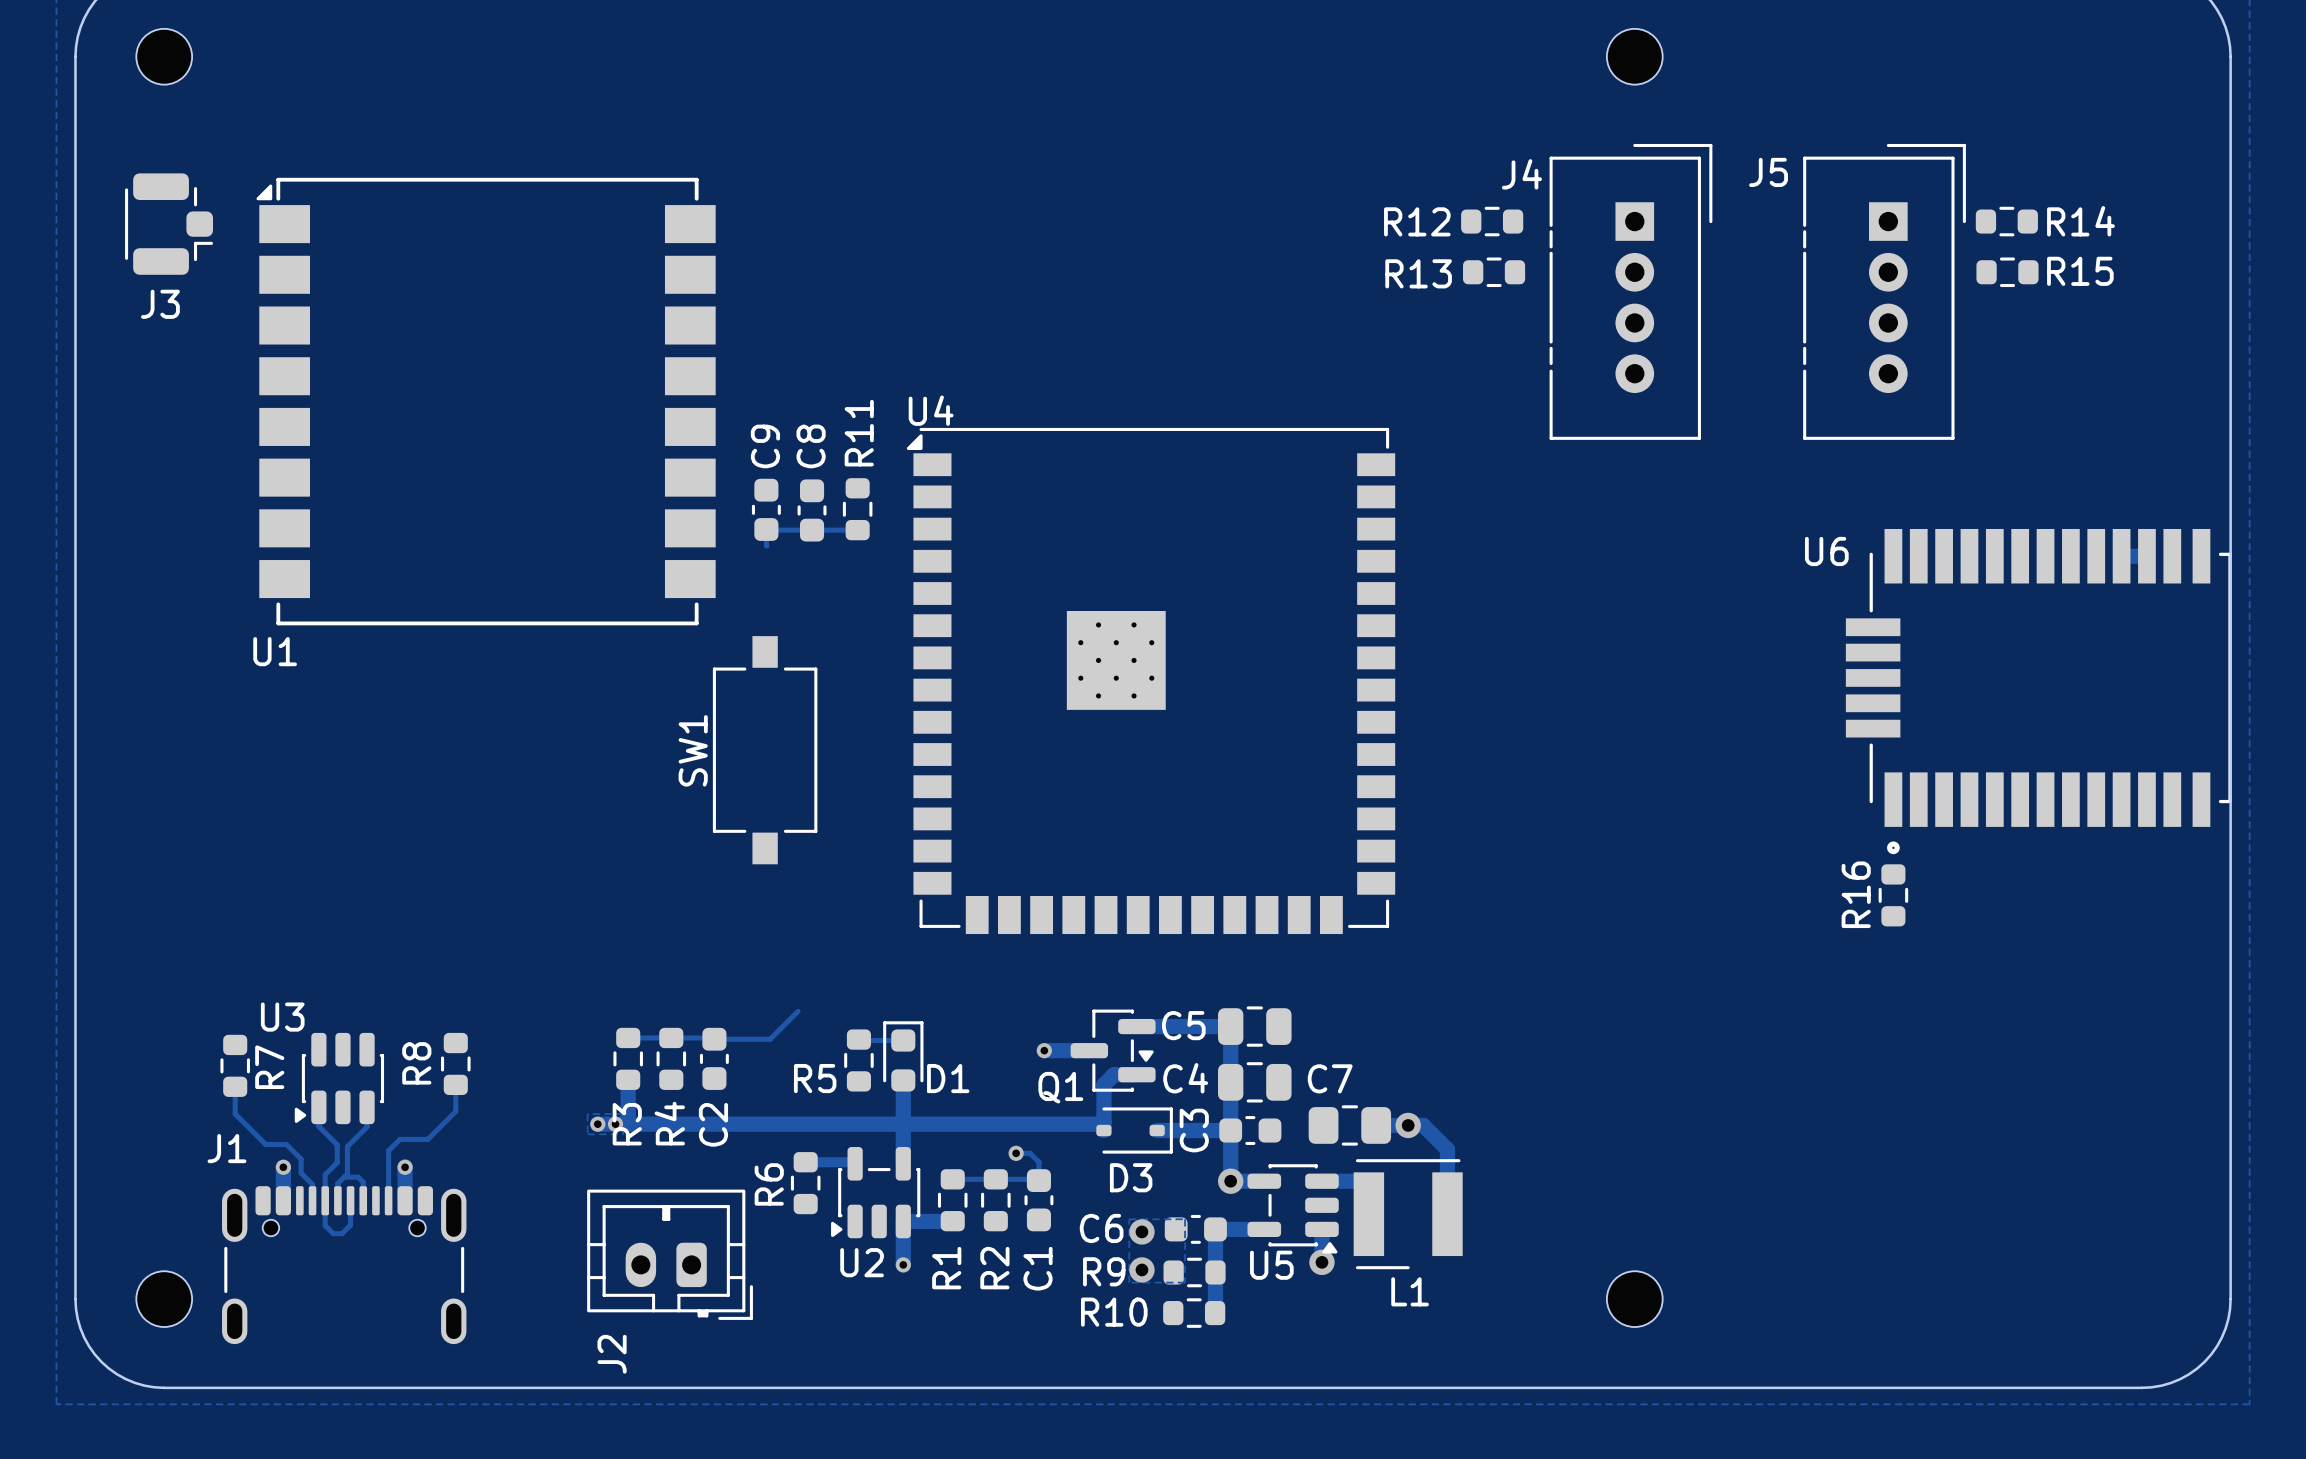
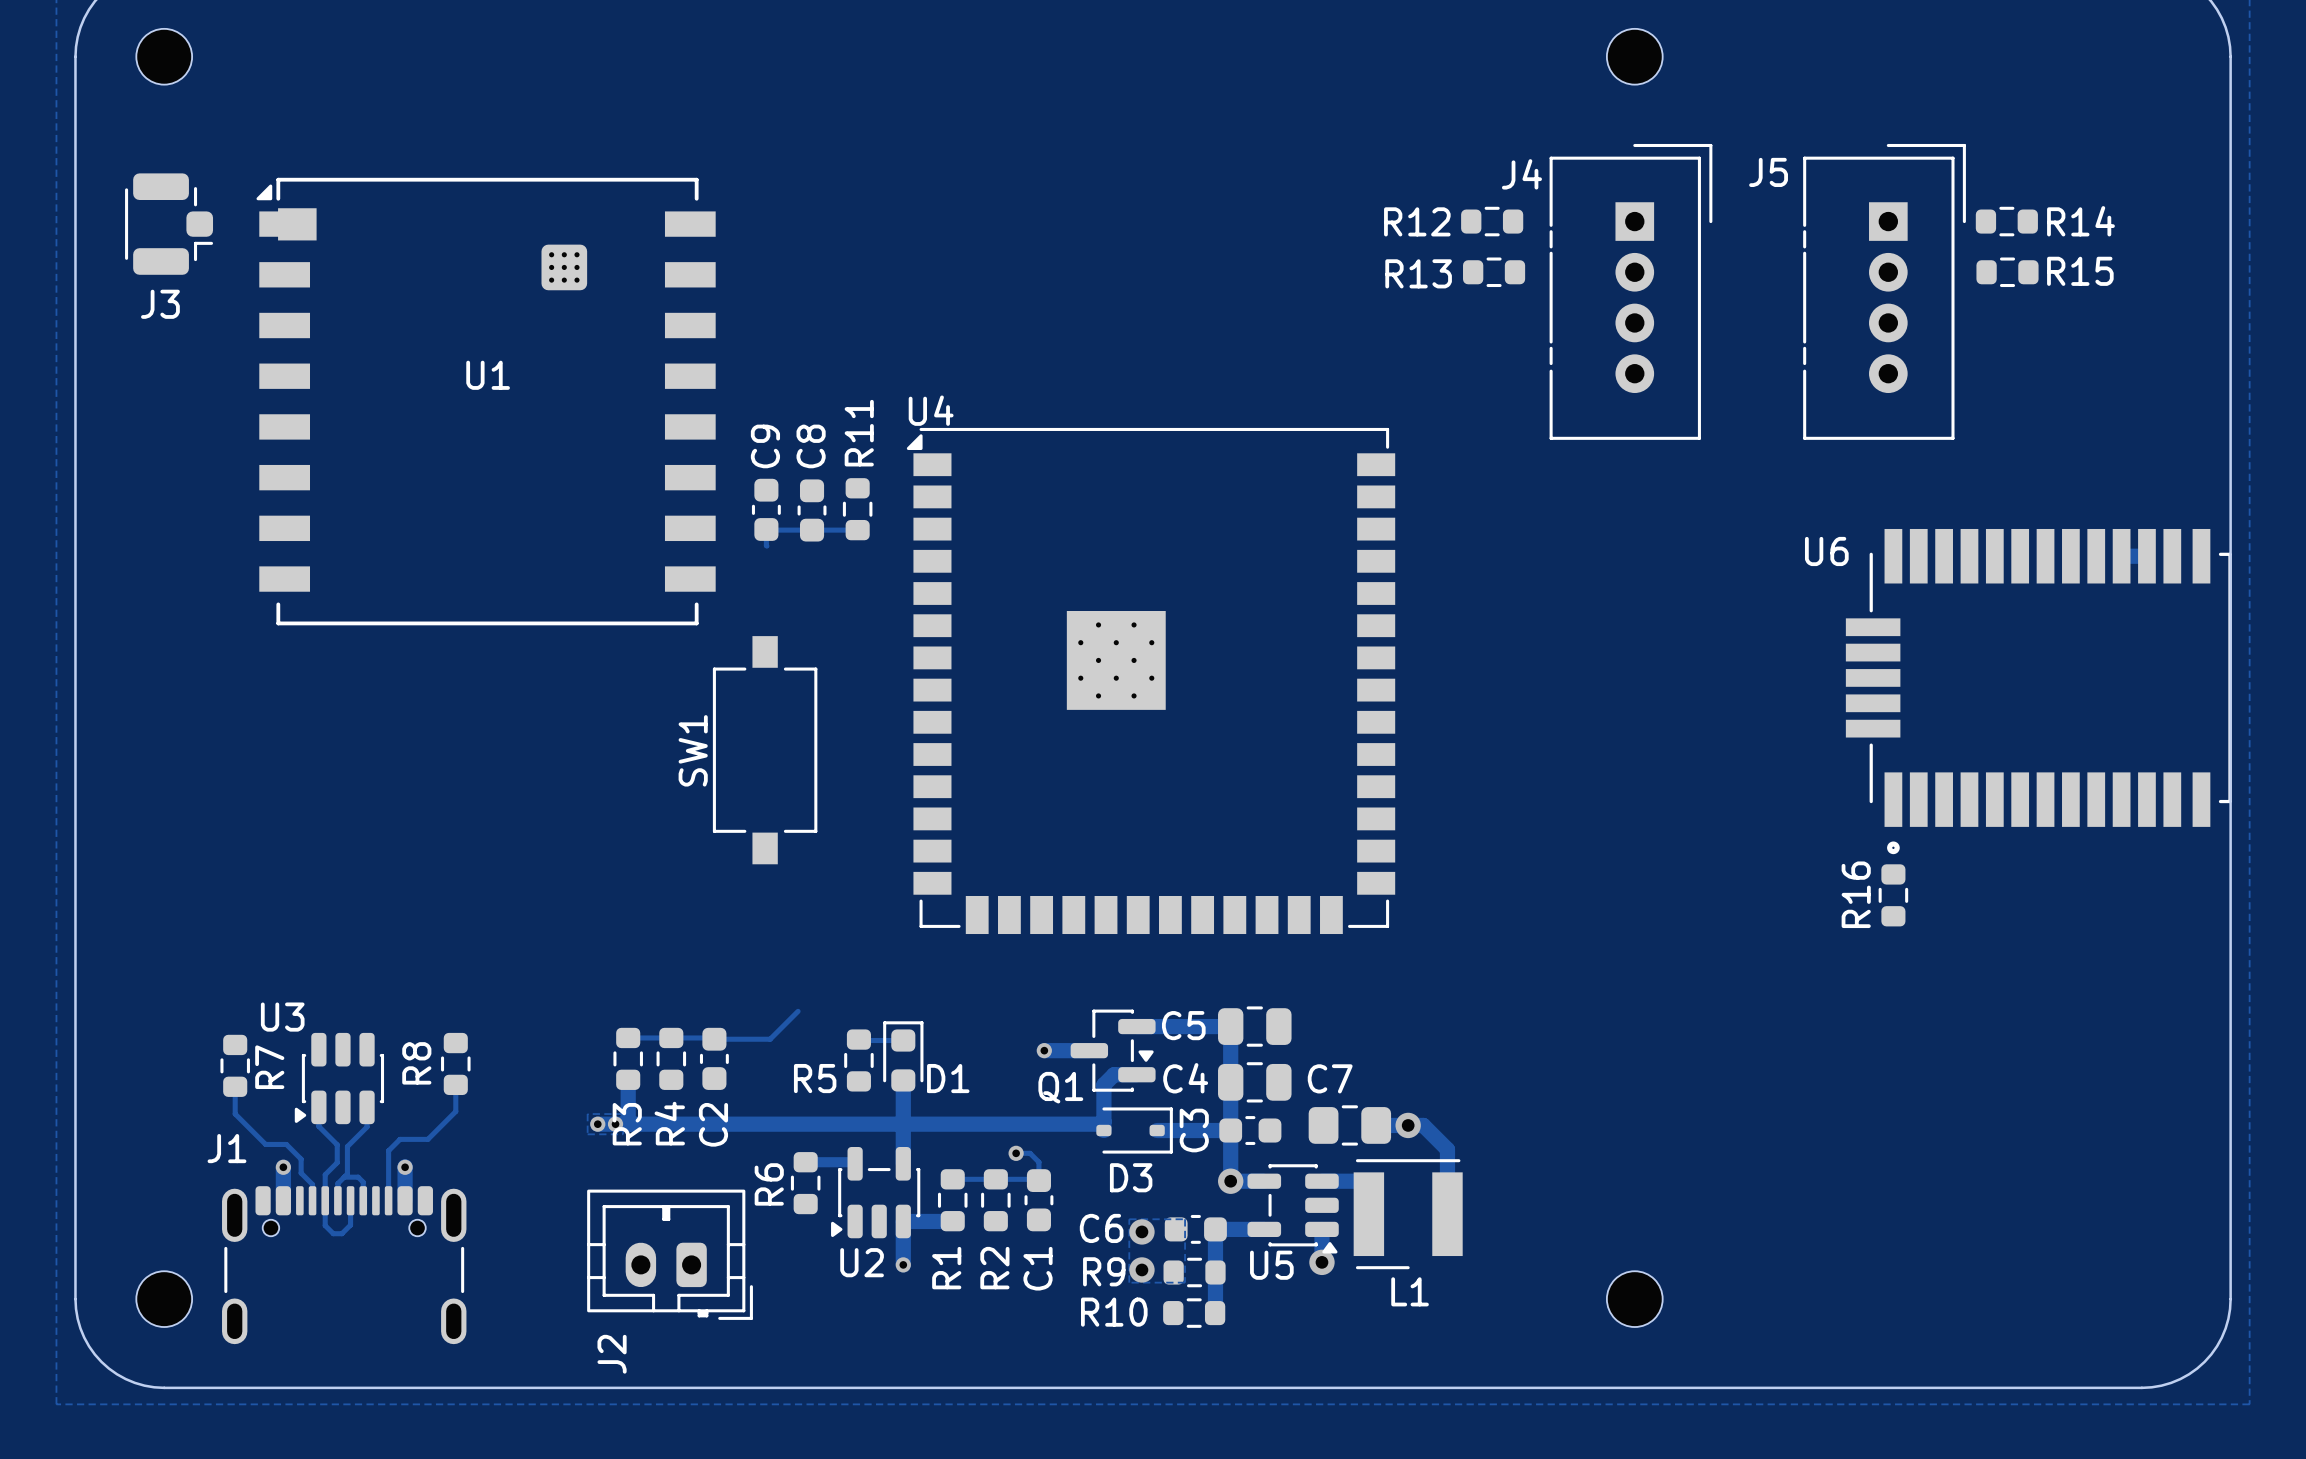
U1 footprint: [256, 177, 716, 626] -> [256, 177, 716, 626]
U1 name position: U1 (275, 651) -> U1 (488, 375)

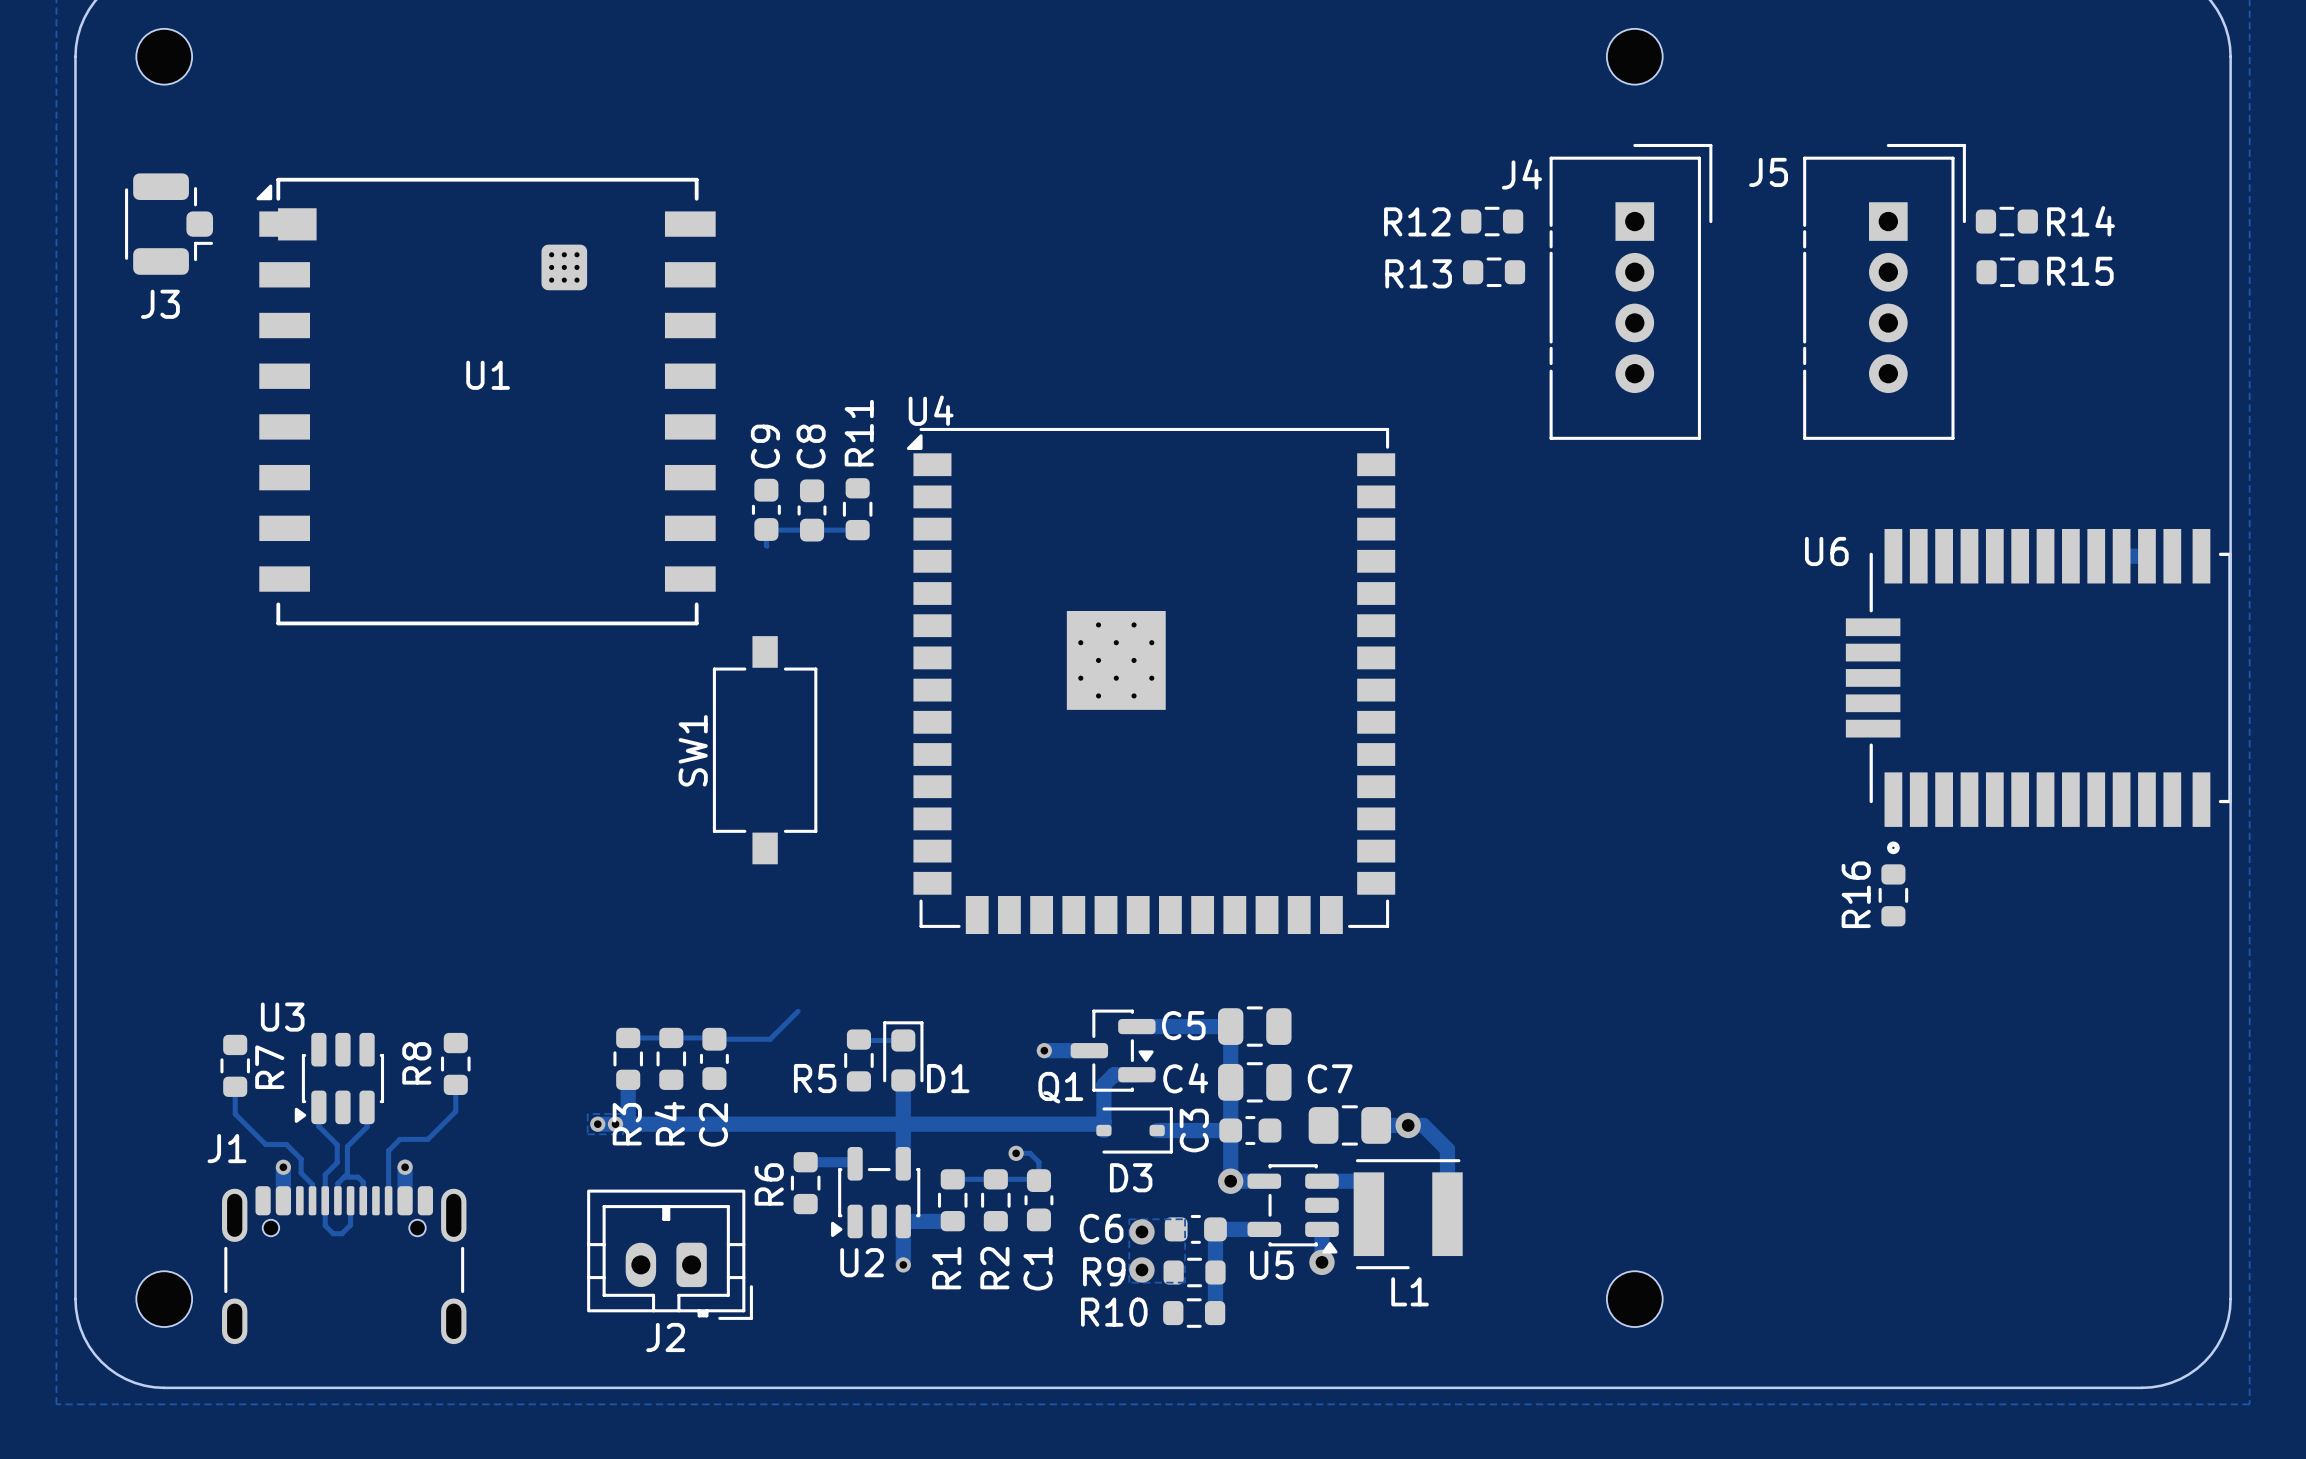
J2 name rotation: 0° (612, 1354) -> 90° clockwise (665, 1337)

